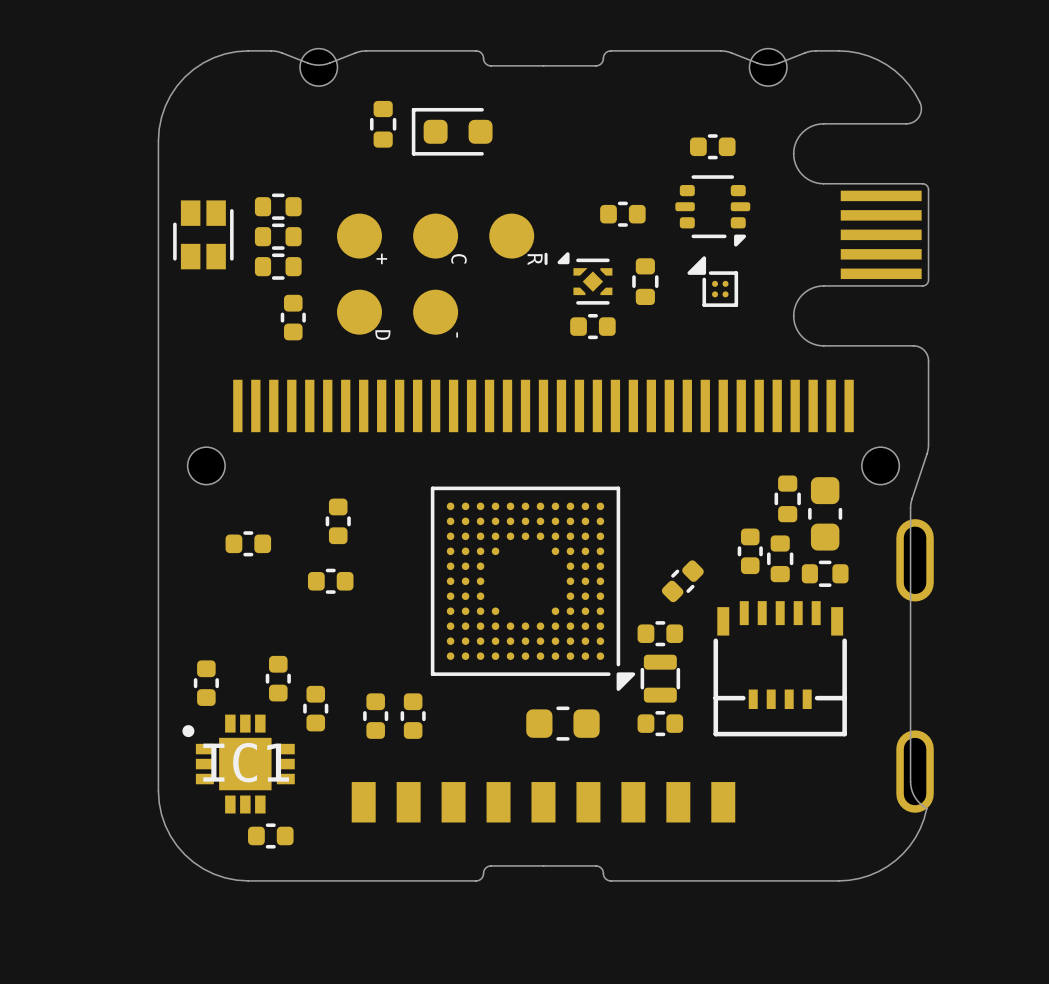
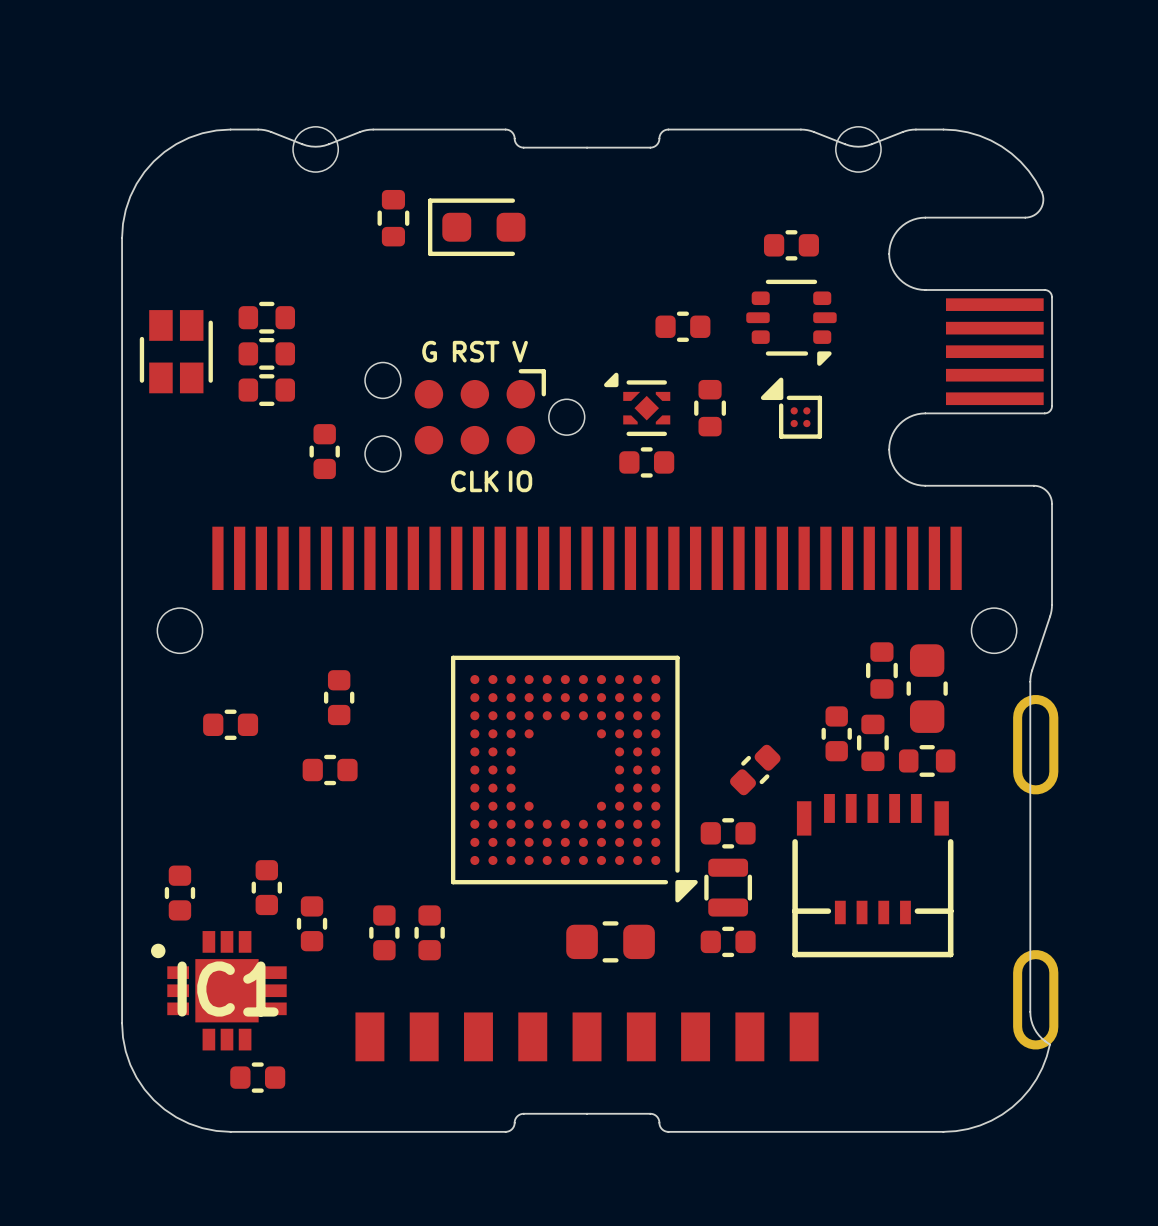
part footprint: [337, 213, 535, 335] -> [365, 362, 585, 472]
text: none -> G (429, 351)
text: none -> RST (476, 351)
text: none -> V (520, 351)
part position: (293, 317) -> (324, 451)
text: none -> CLK (474, 481)
text: none -> IO (520, 481)

